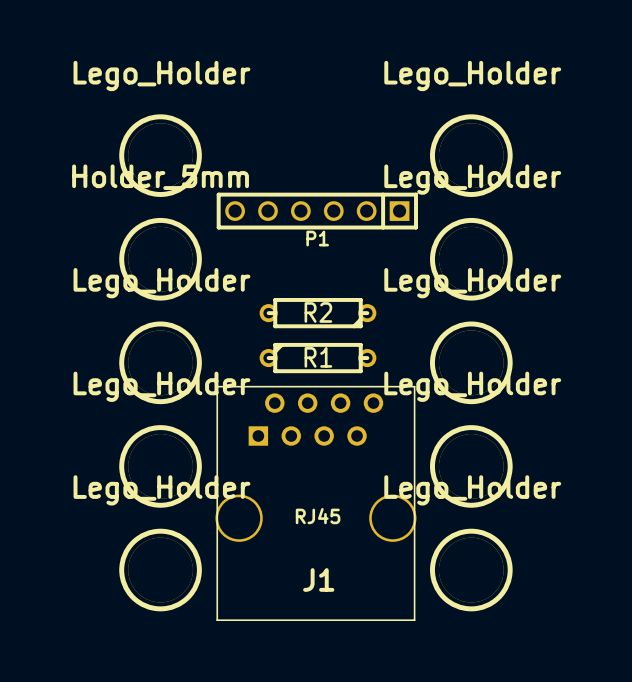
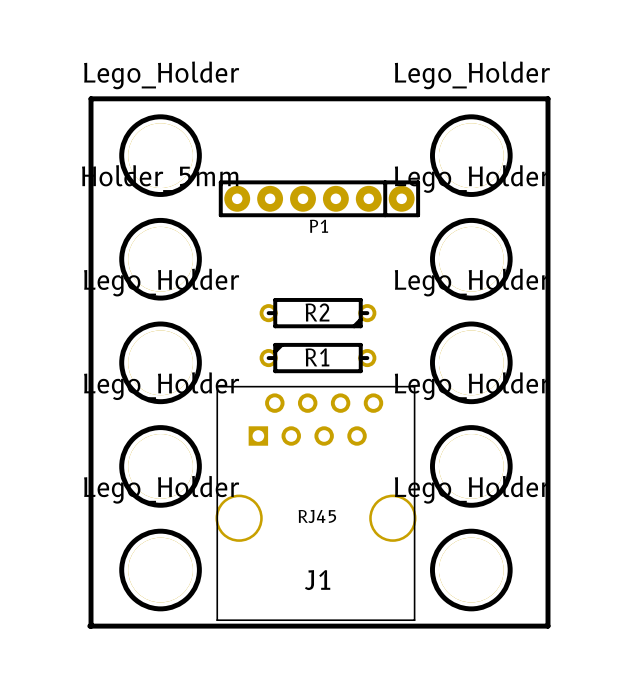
P1 footprint: [216, 192, 418, 230] -> [218, 180, 421, 218]
board edge: none -> (89, 626) (547, 626) (547, 98) (91, 98) (91, 626)

